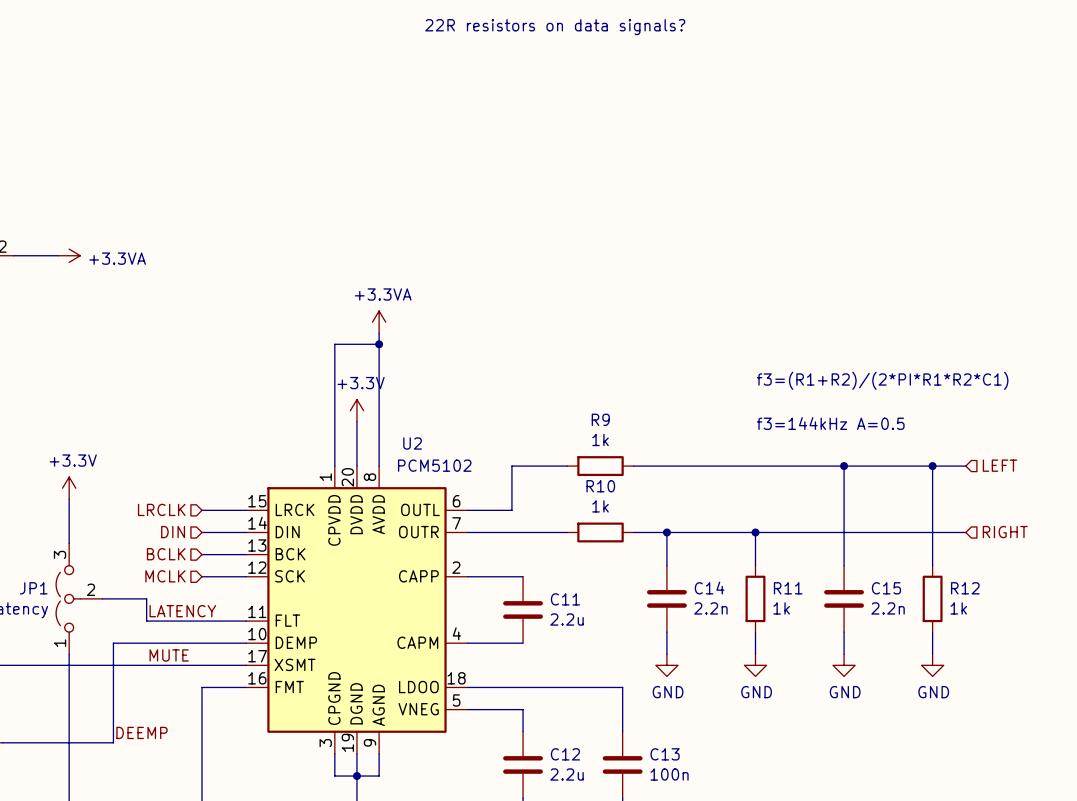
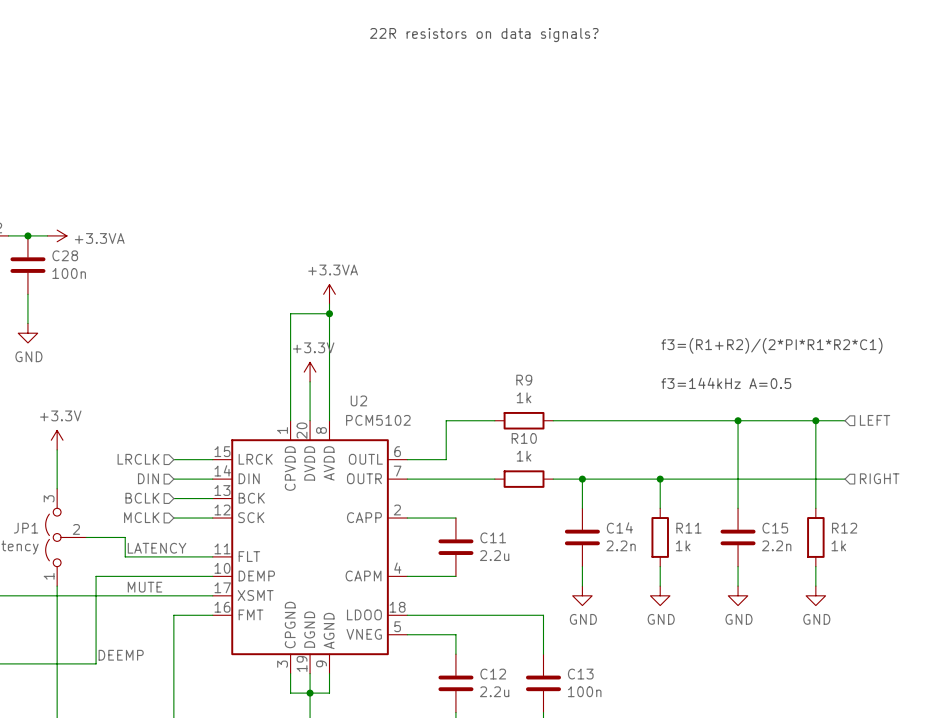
junction: none -> (27, 235)
C28: none -> 100n (27, 265)
wire: none -> (27, 294) (27, 323)
power symbol: none -> GND (27, 333)

